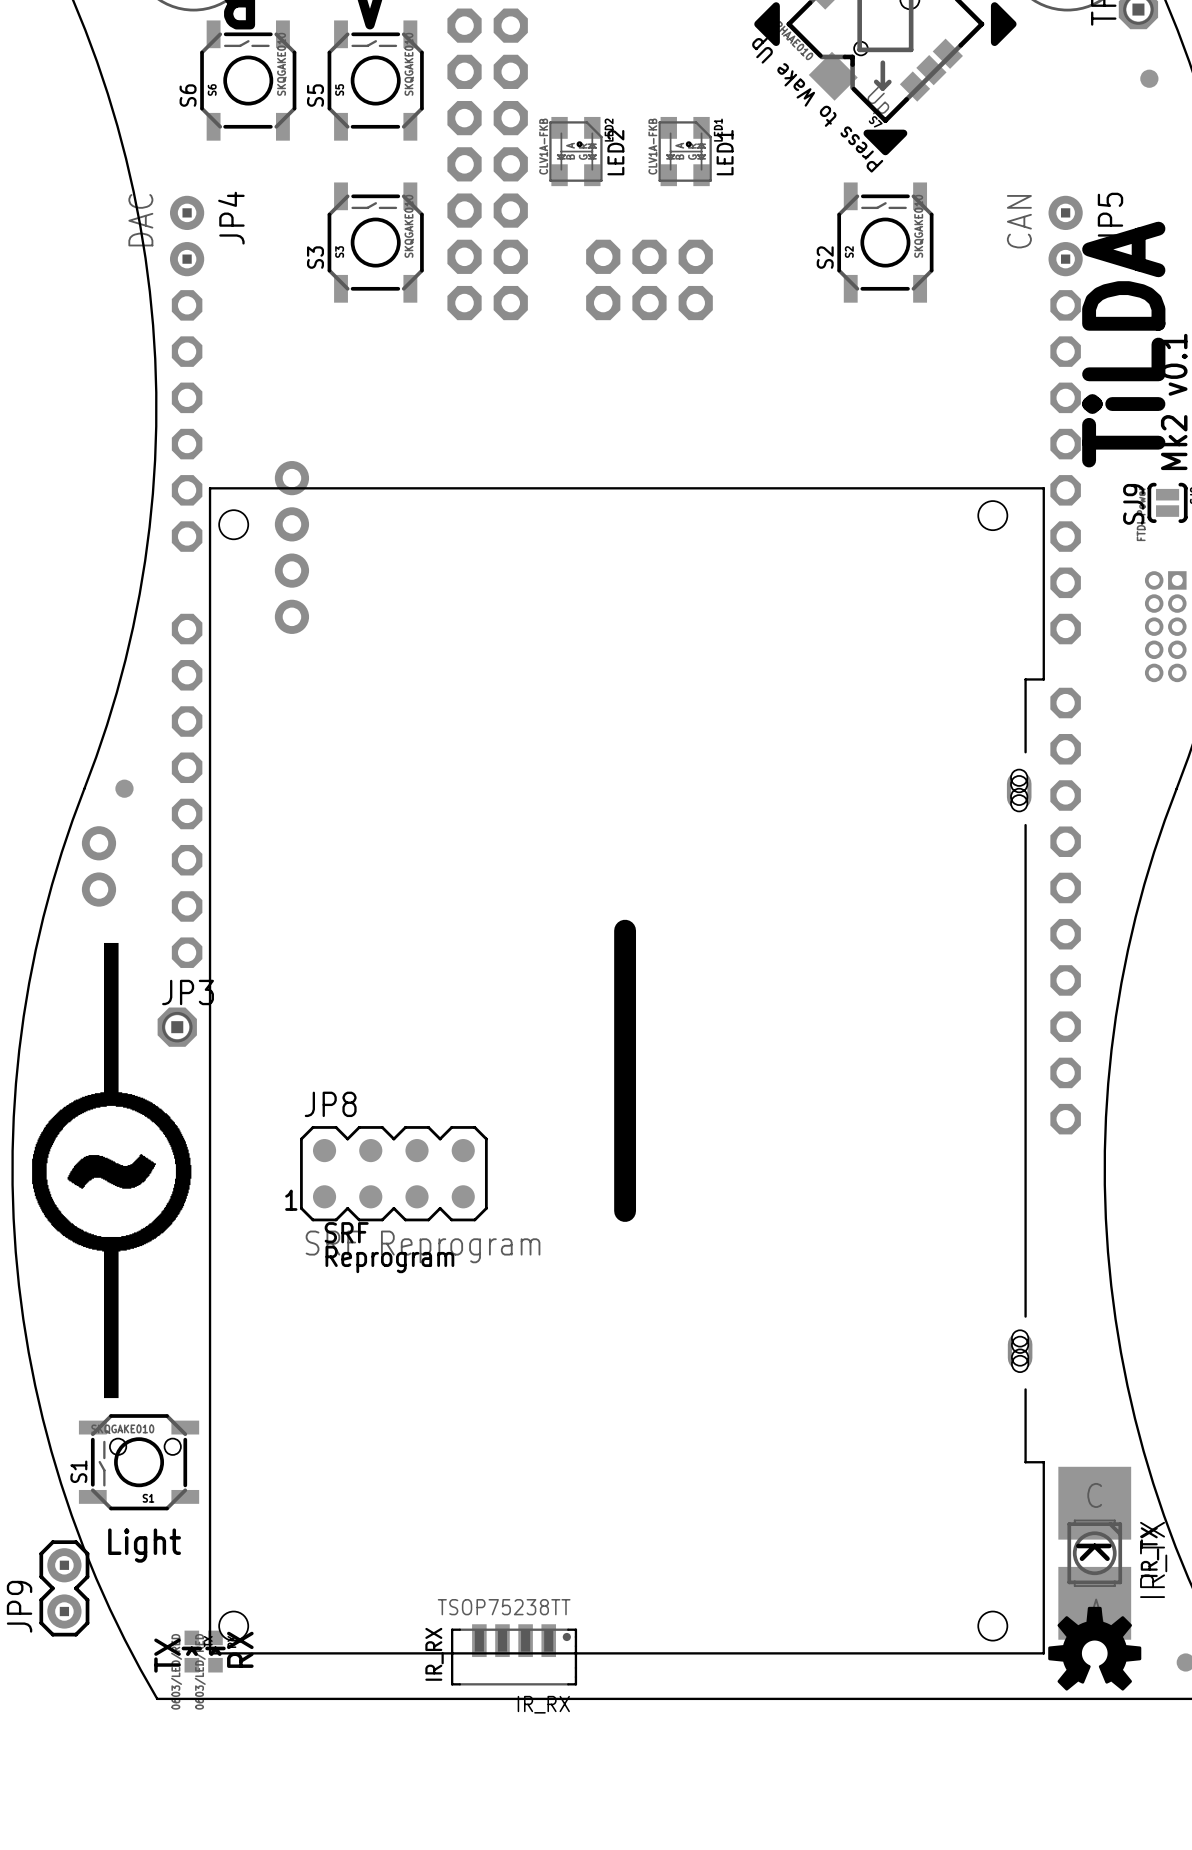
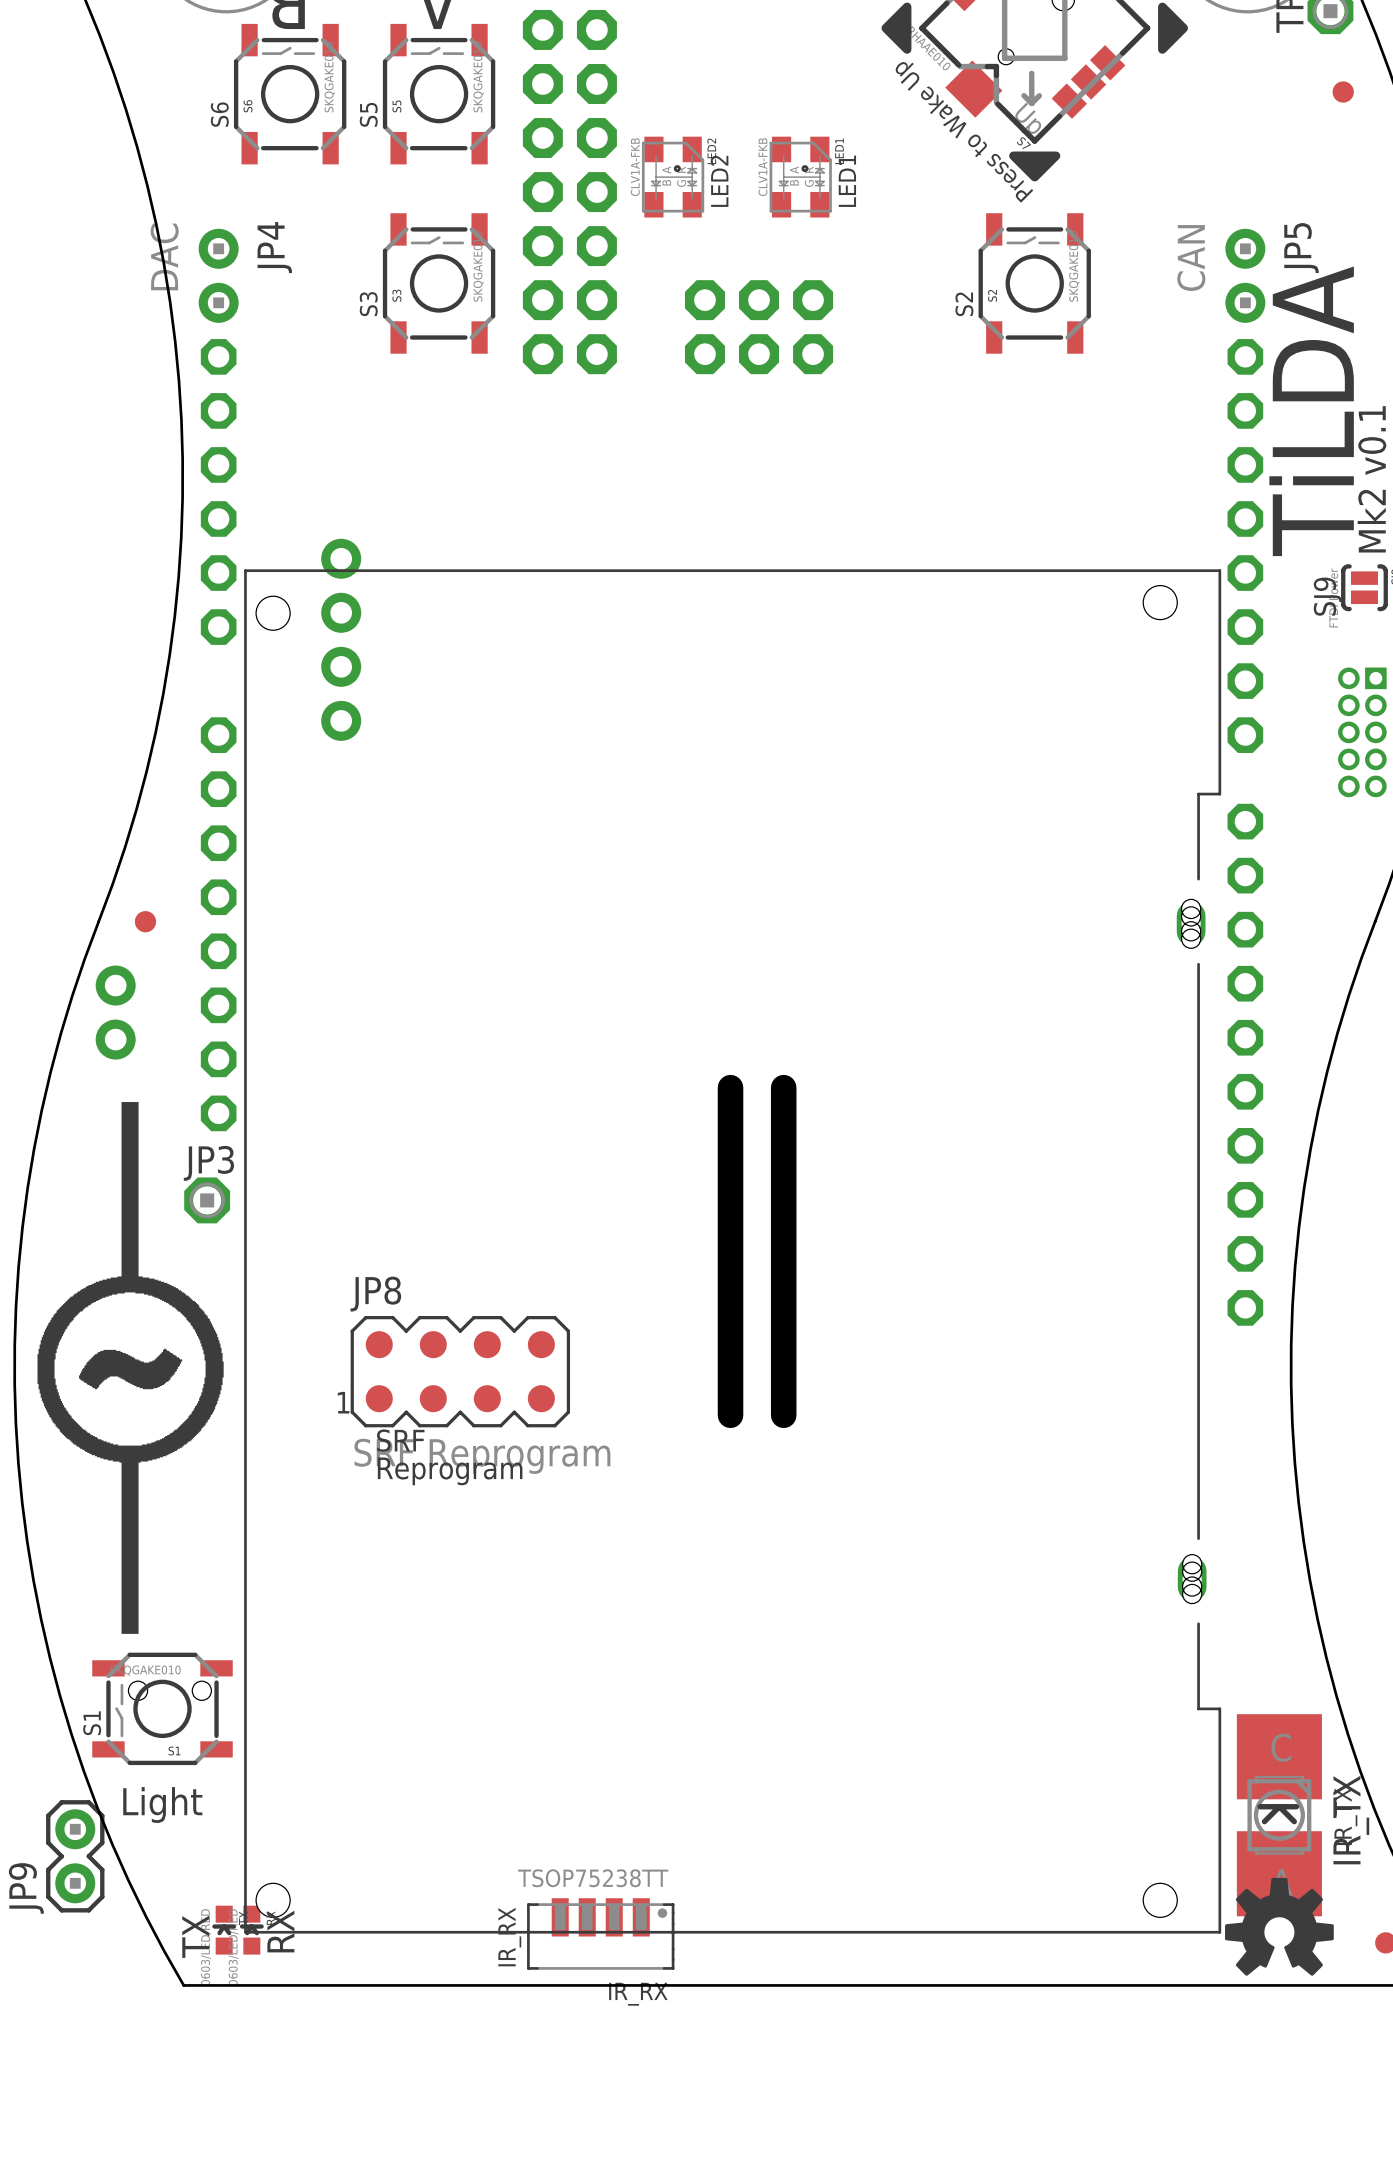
board edge: none -> (783, 1087) (783, 1415)

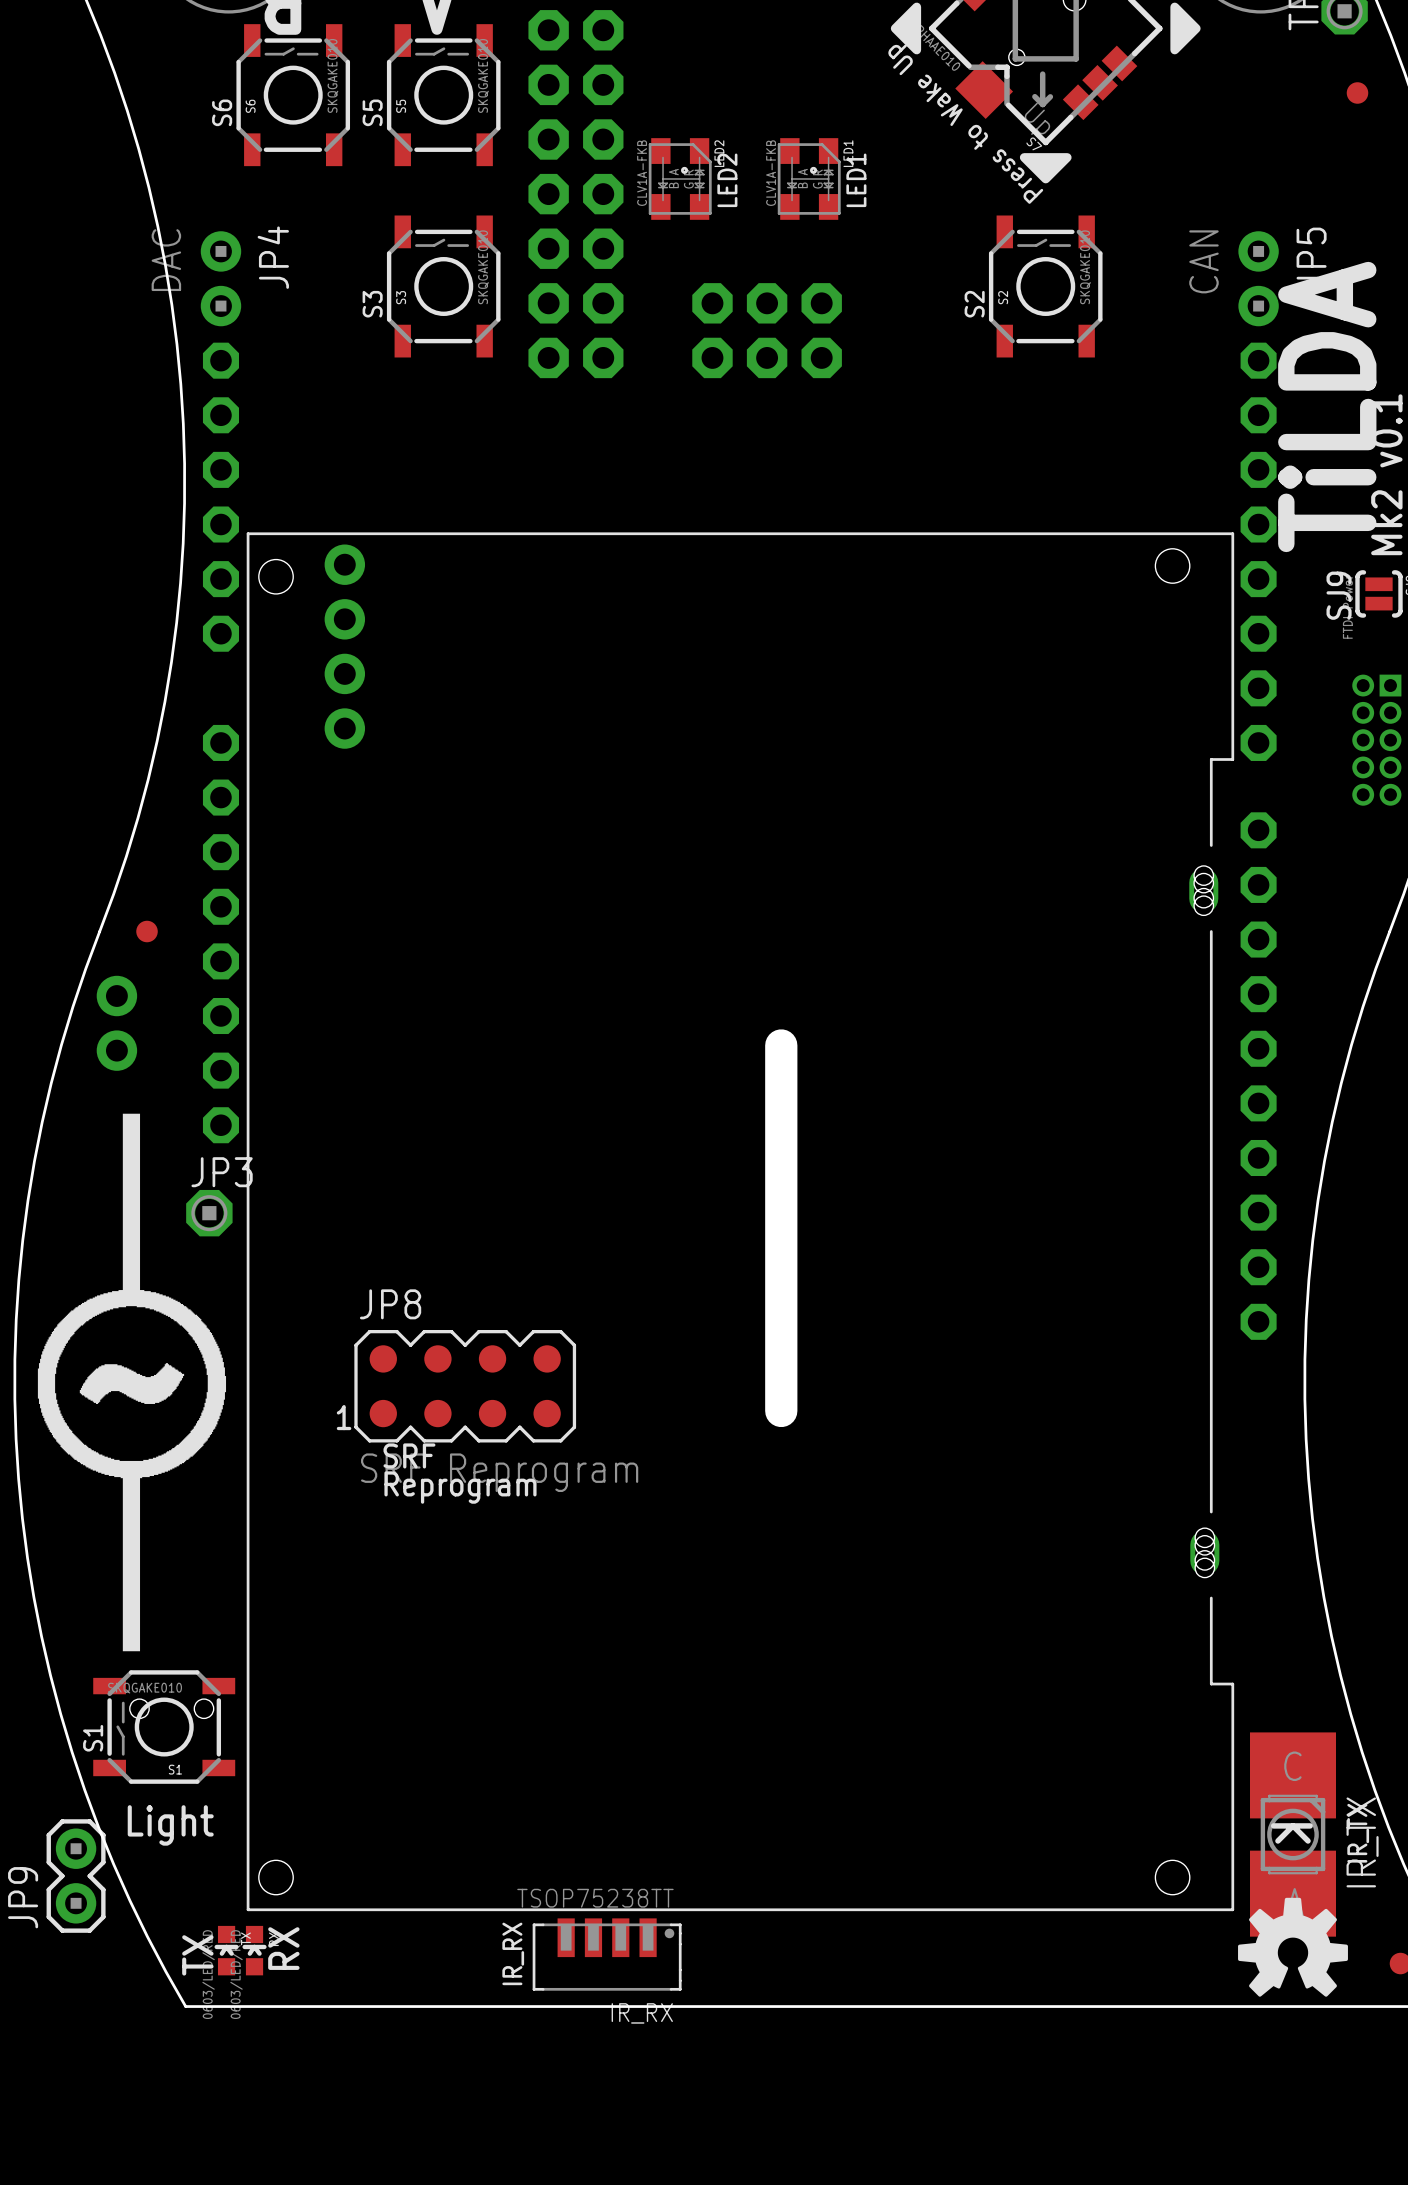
board edge: none -> (781, 1045) (781, 1410)
board edge: (730, 1087) (730, 1415) -> none
board edge: (783, 1087) (783, 1415) -> none
part position: (732, 1251) -> (740, 1221)

